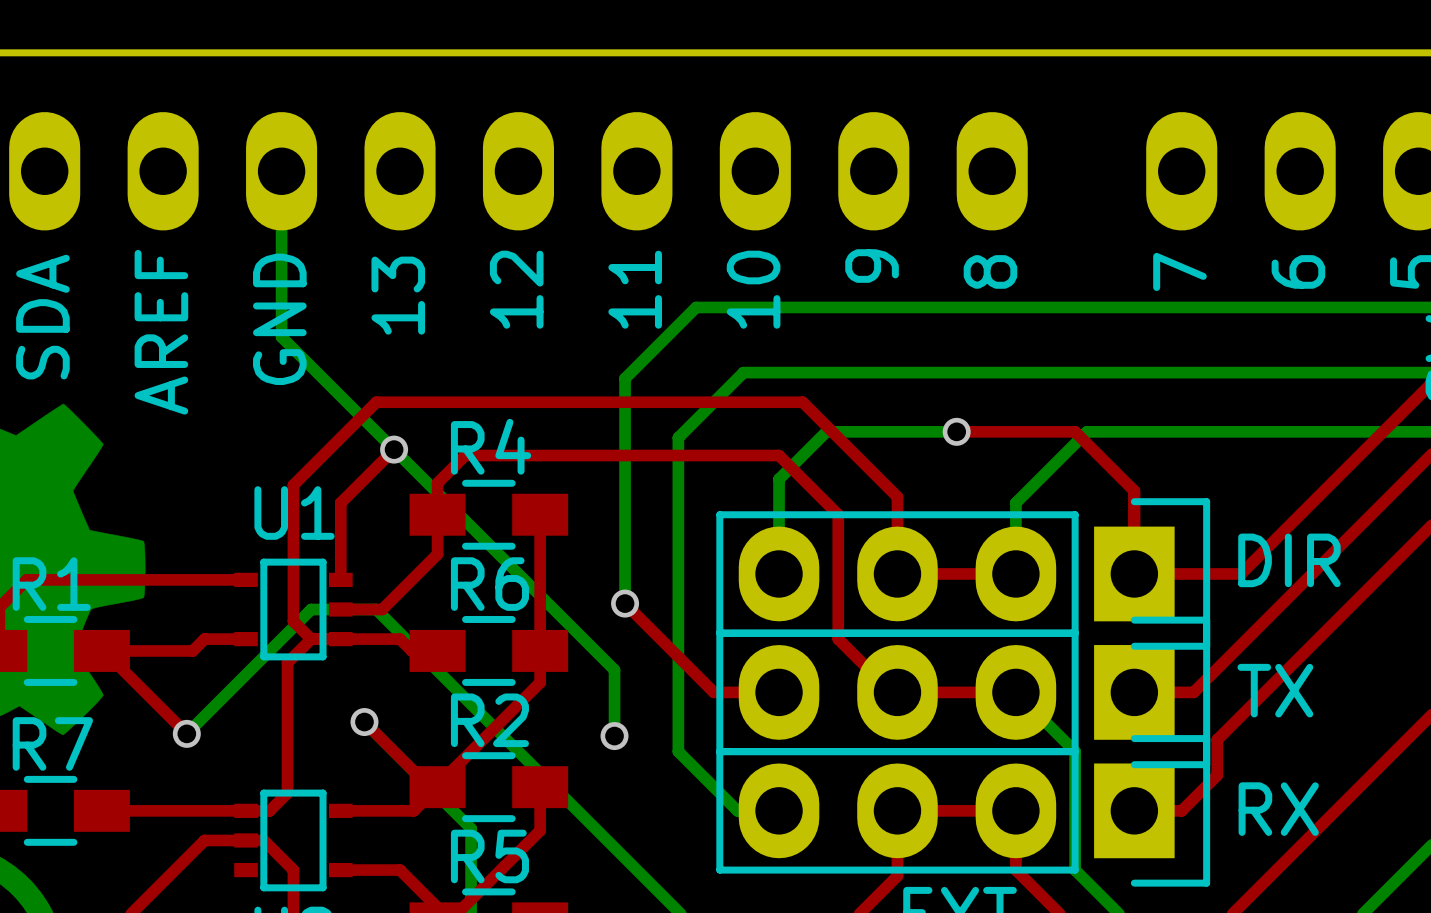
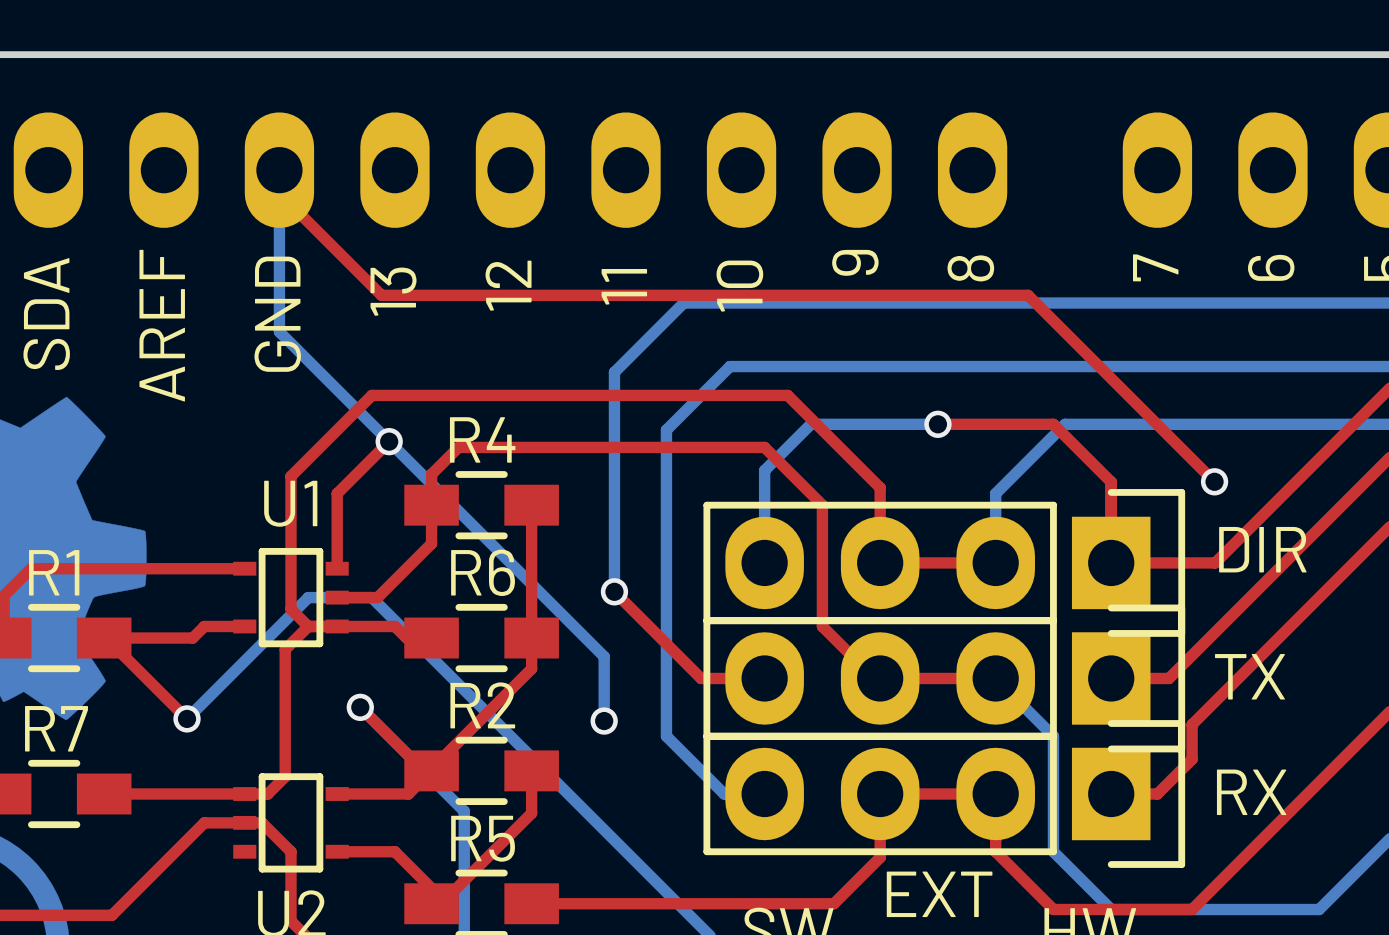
top track: none -> (279, 170) (279, 193) (381, 295) (1028, 295) (1214, 481)
via: none -> (1214, 481)

